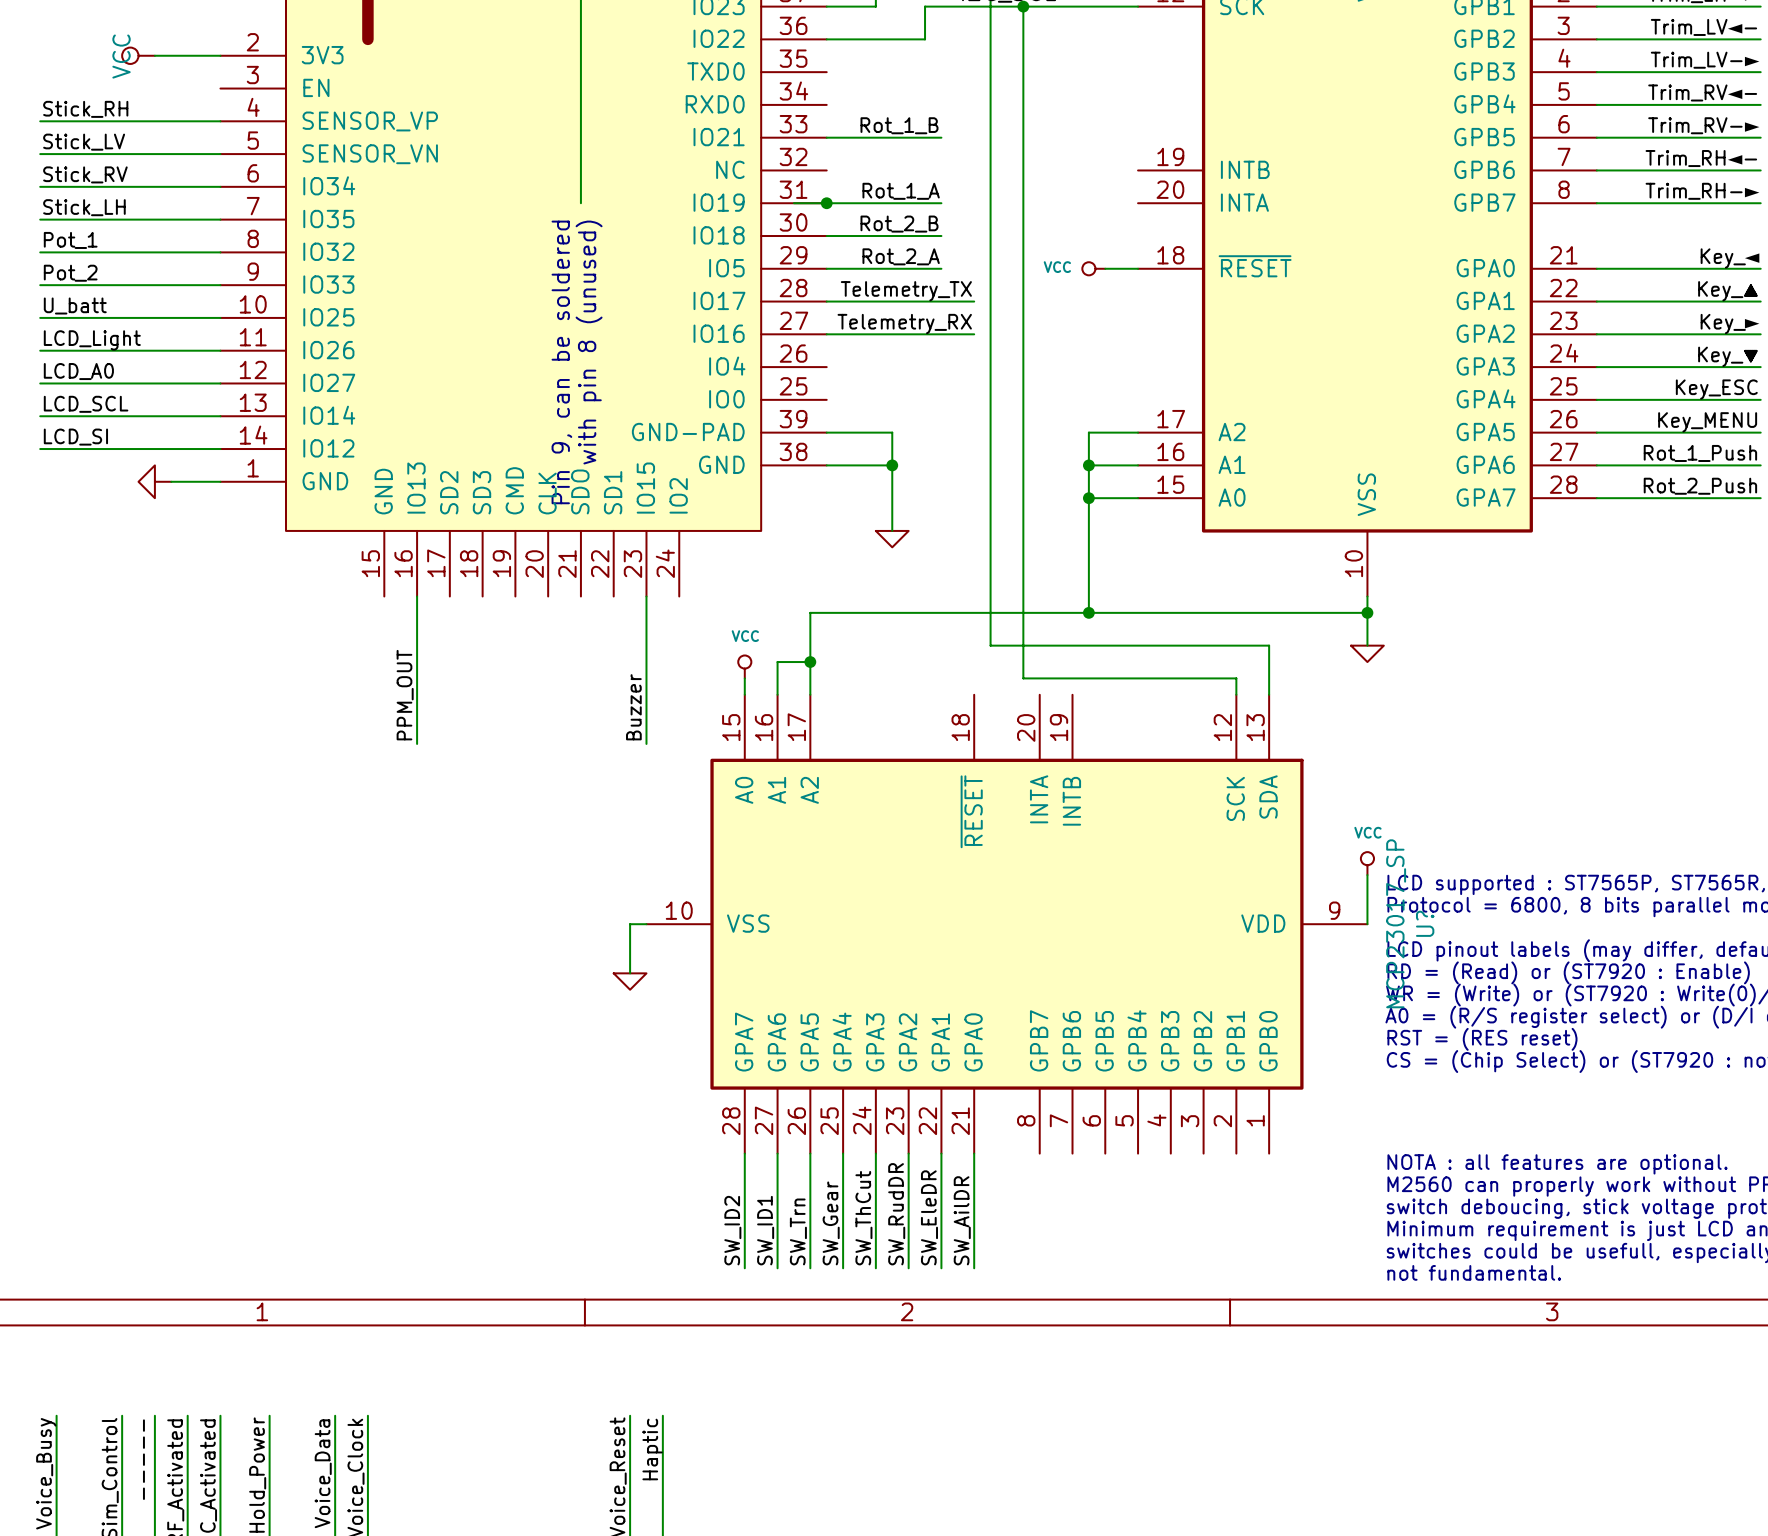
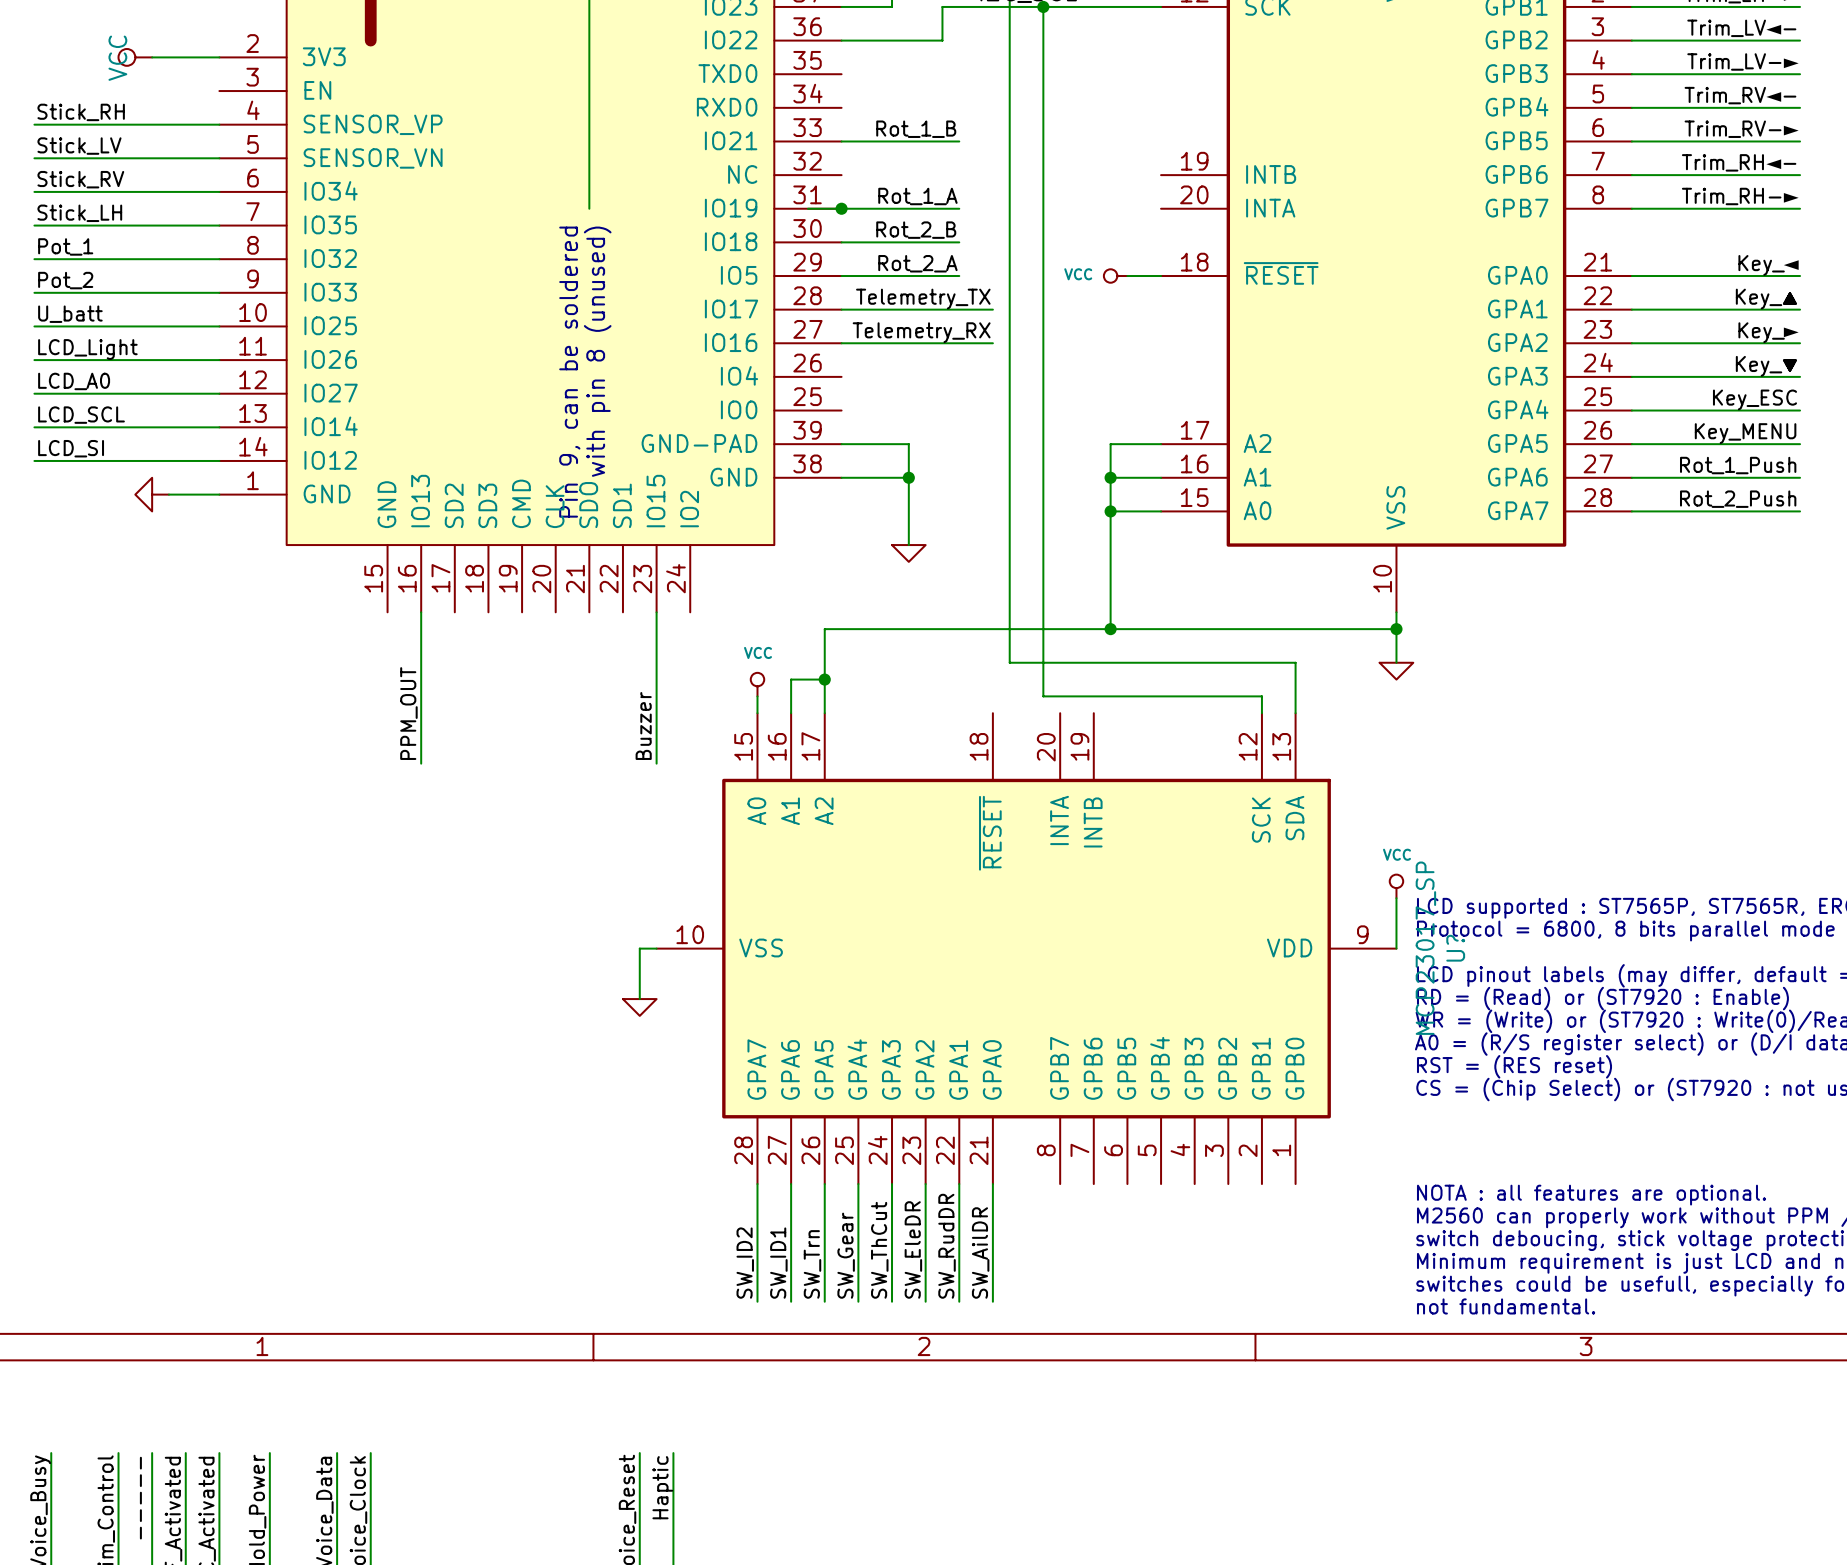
label: SW_RudDR (896, 1214) -> SW_EleDR (913, 1249)
label: SW_EleDR (929, 1217) -> SW_RudDR (947, 1246)

